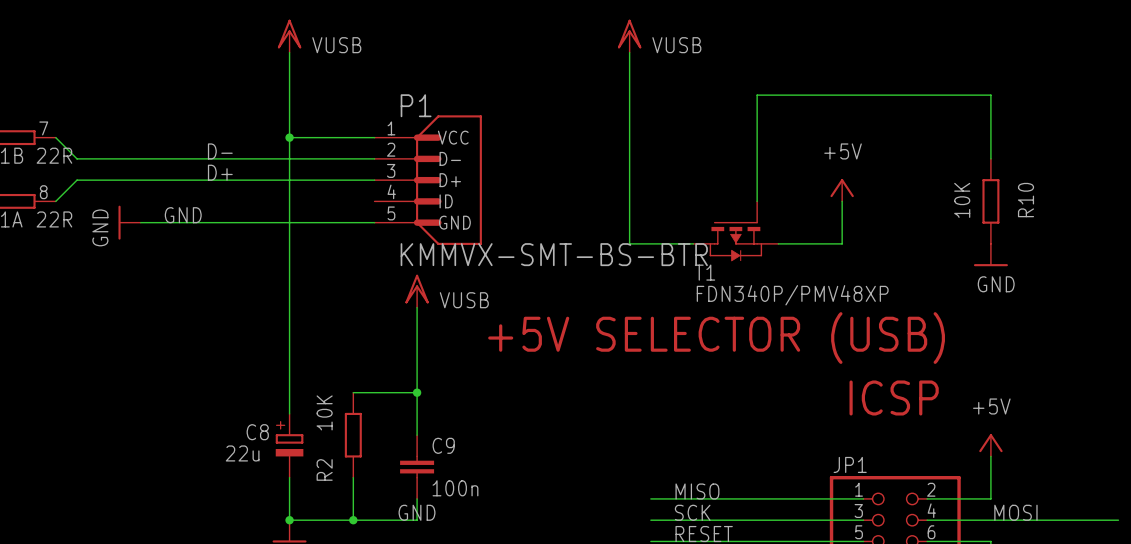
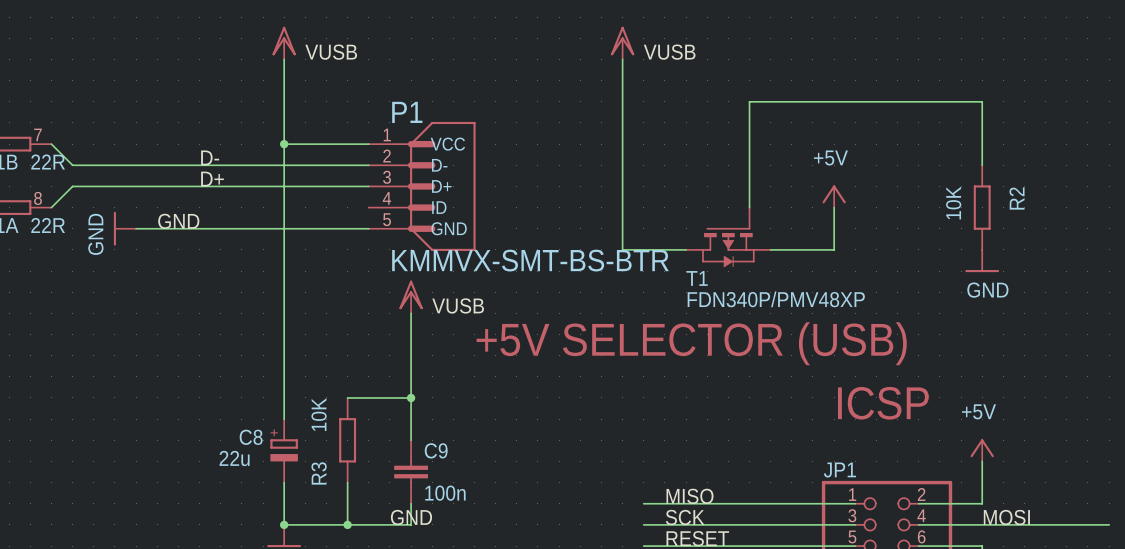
R10 name: R10 (1026, 200) -> R2 (1017, 198)
R2 name: R2 (324, 469) -> R3 (319, 473)

